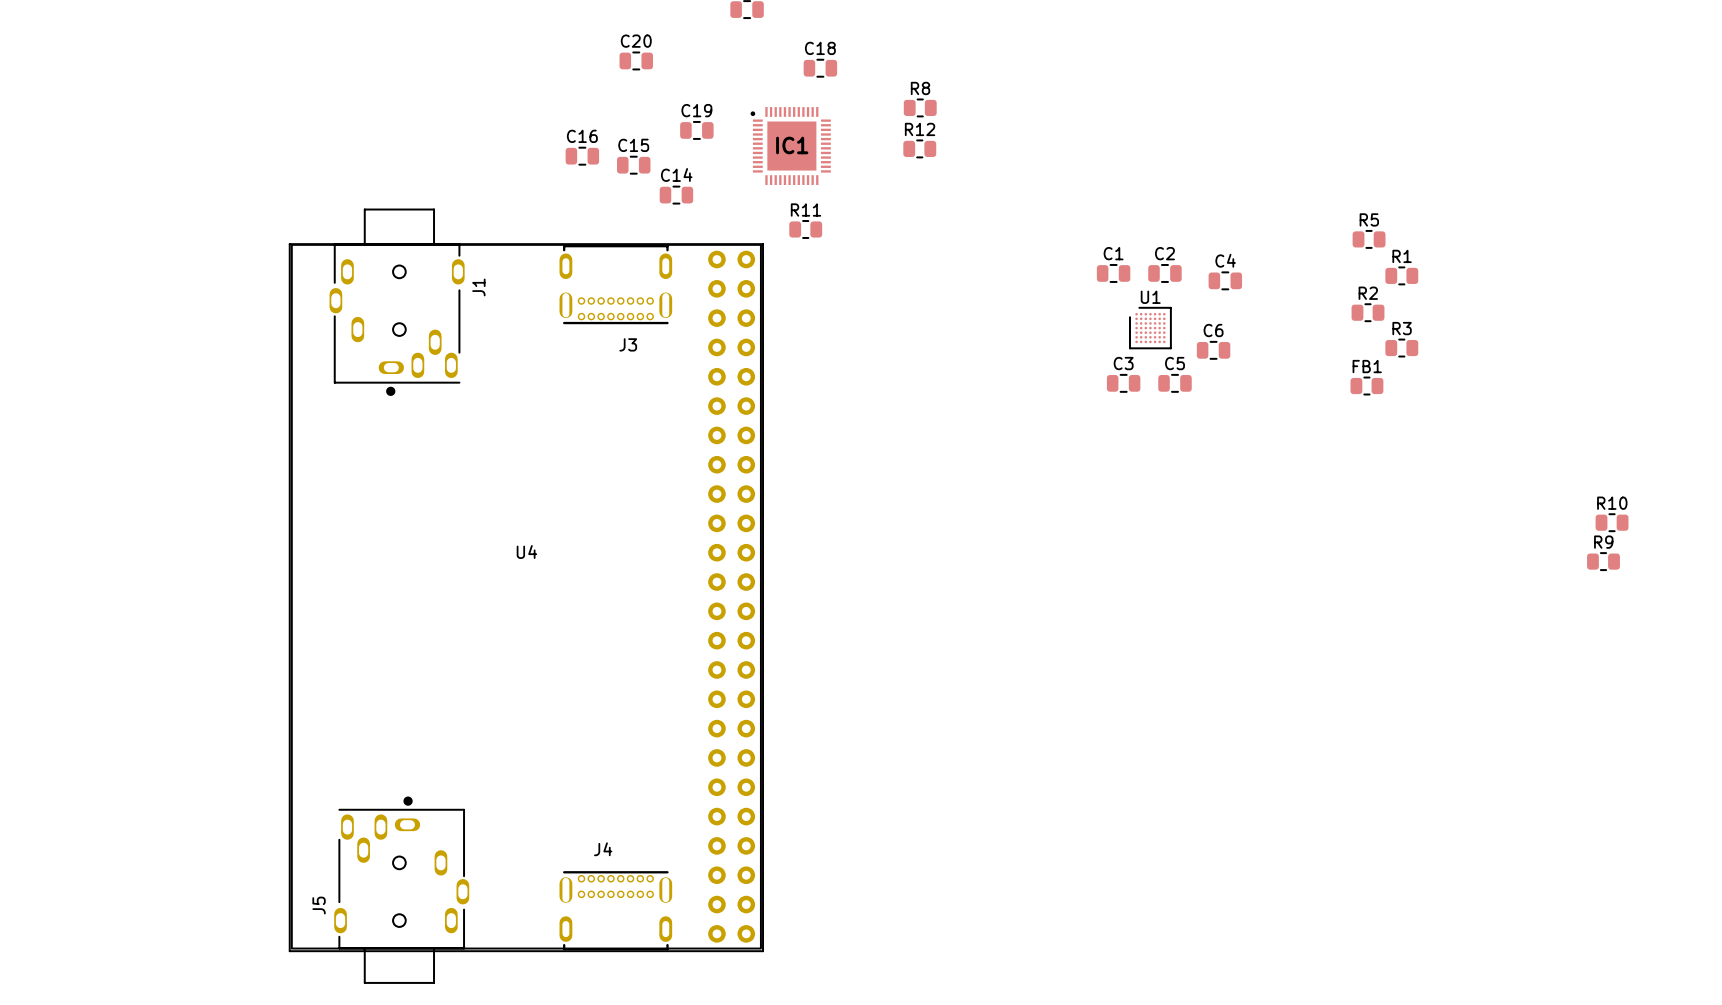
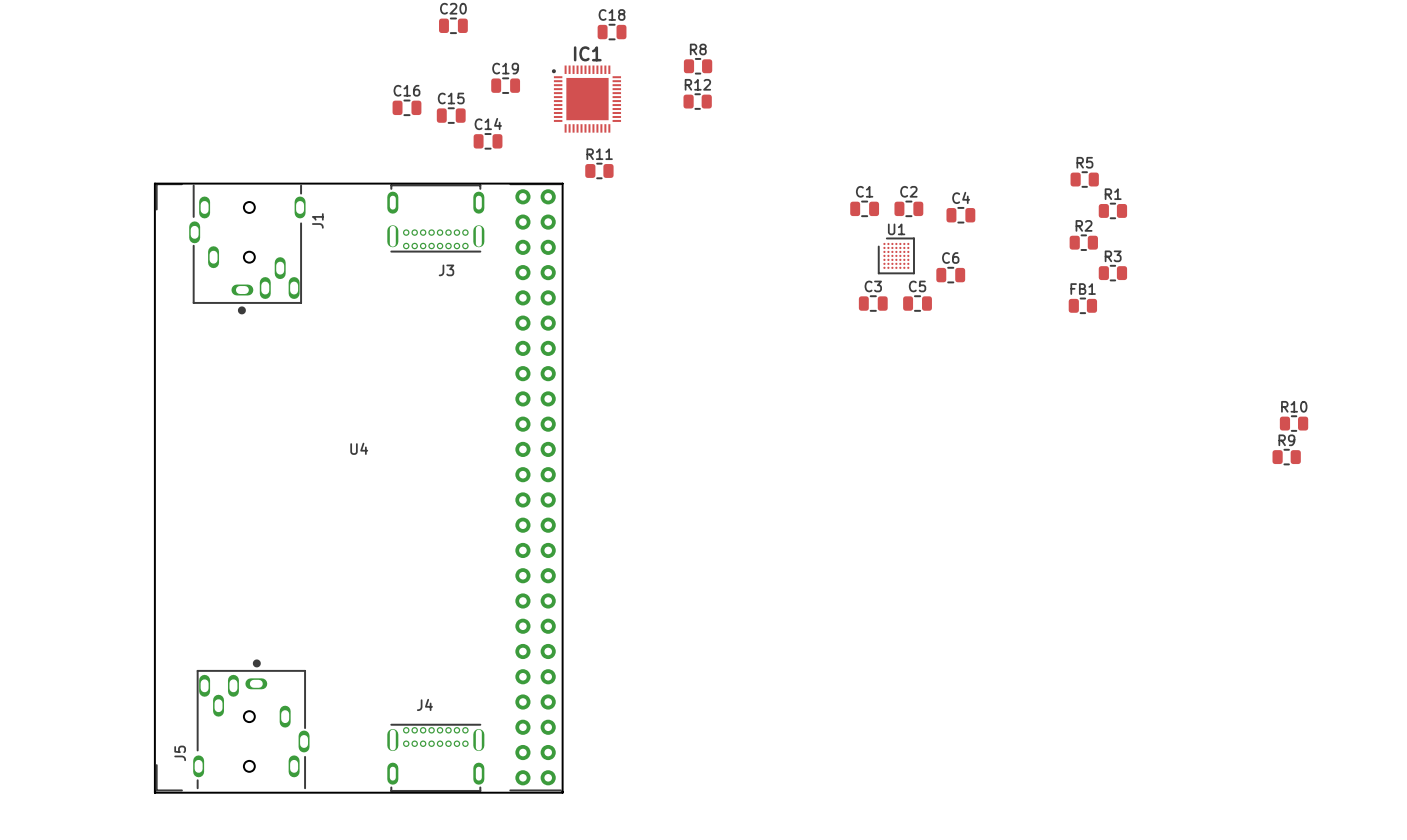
IC1 name position: IC1 (792, 145) -> IC1 (587, 53)
J1 footprint: [329, 208, 465, 396] -> [189, 184, 306, 315]
U4 footprint: [291, 244, 762, 950] -> [156, 183, 562, 792]
J5 footprint: [334, 796, 470, 984] -> [193, 659, 310, 789]

